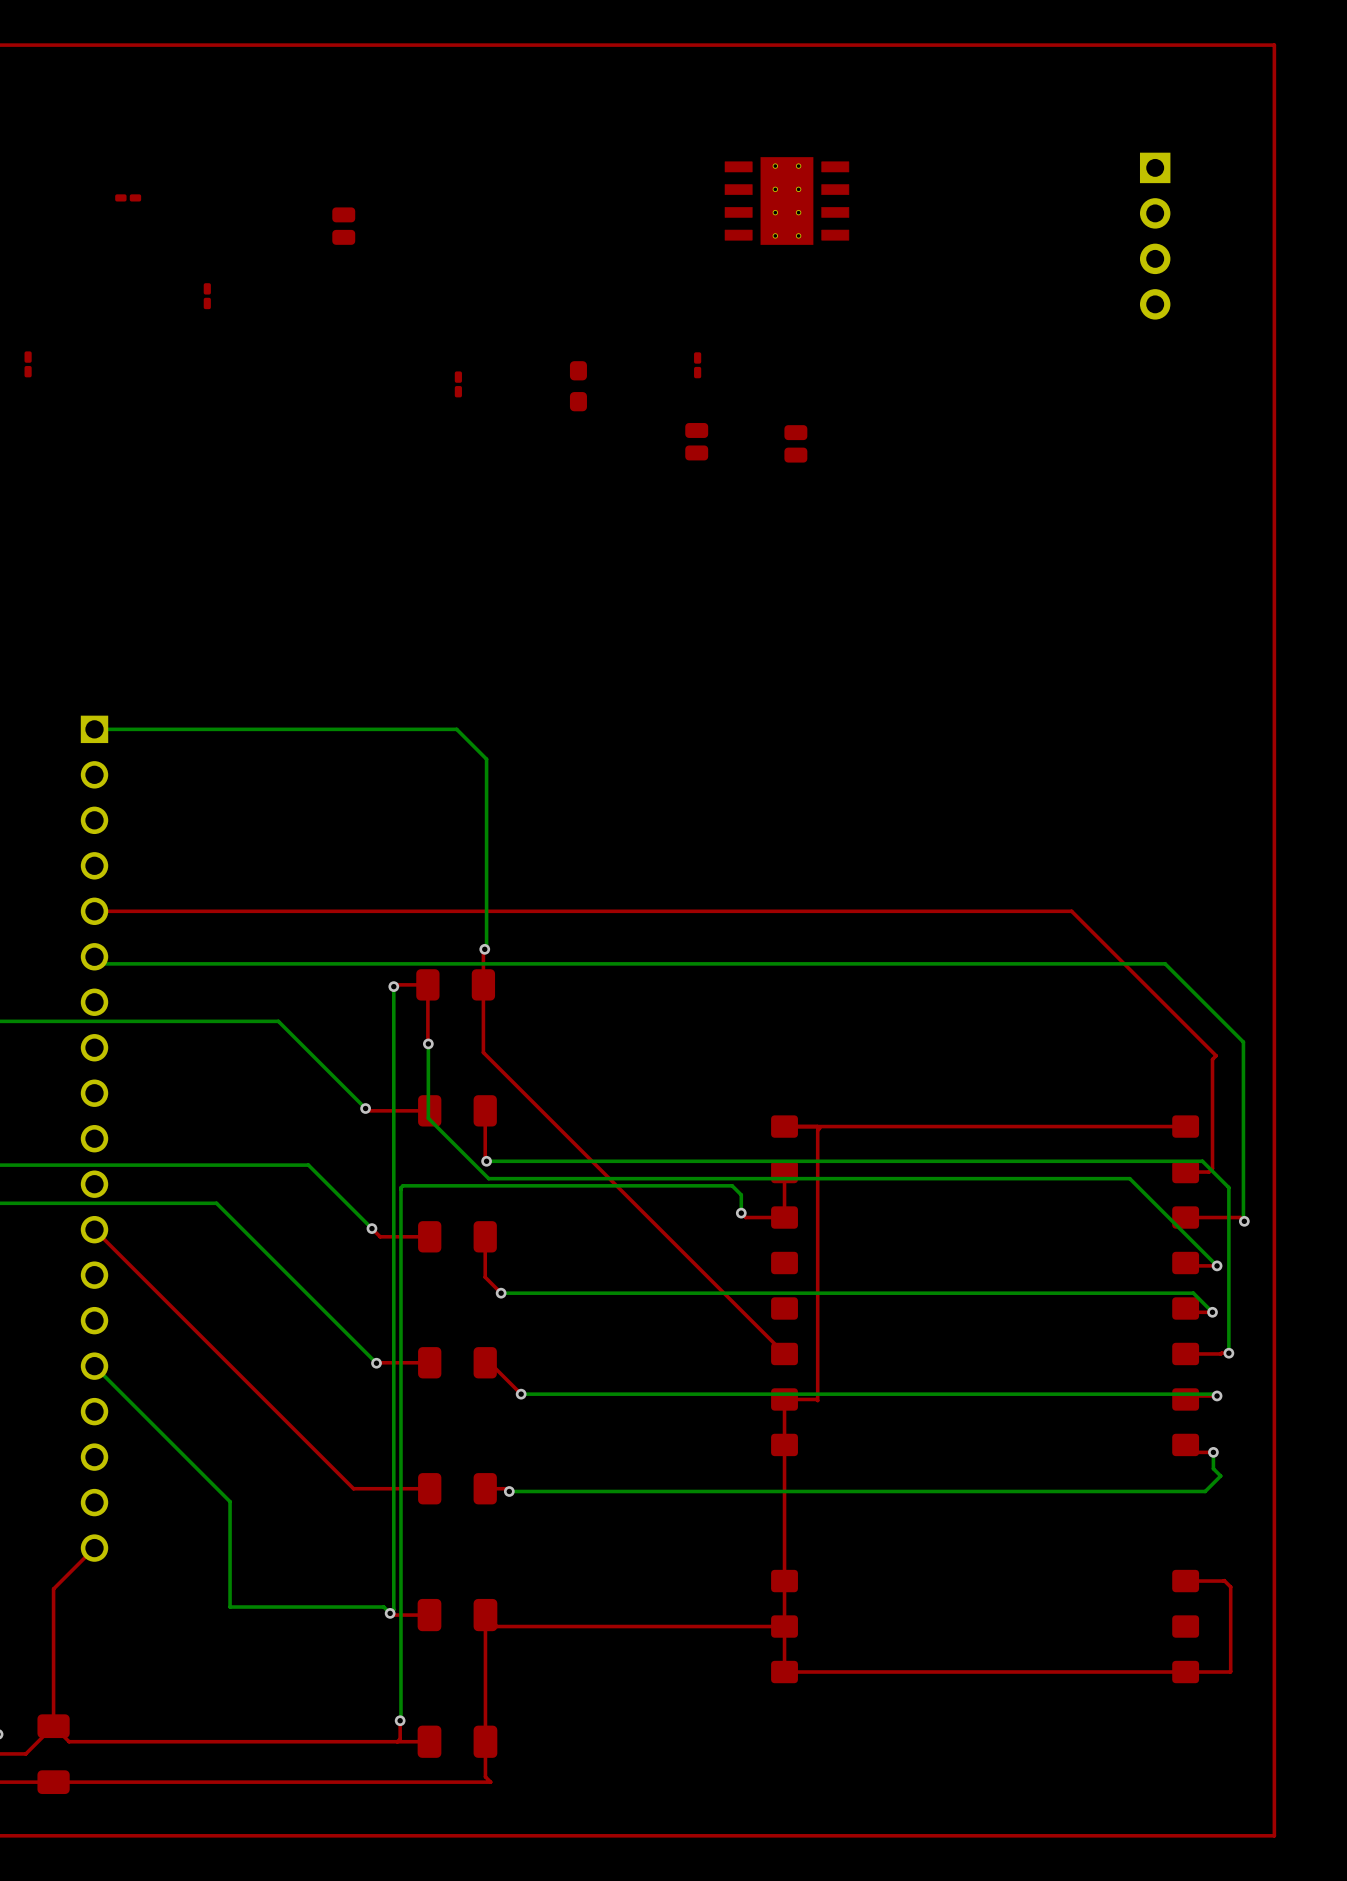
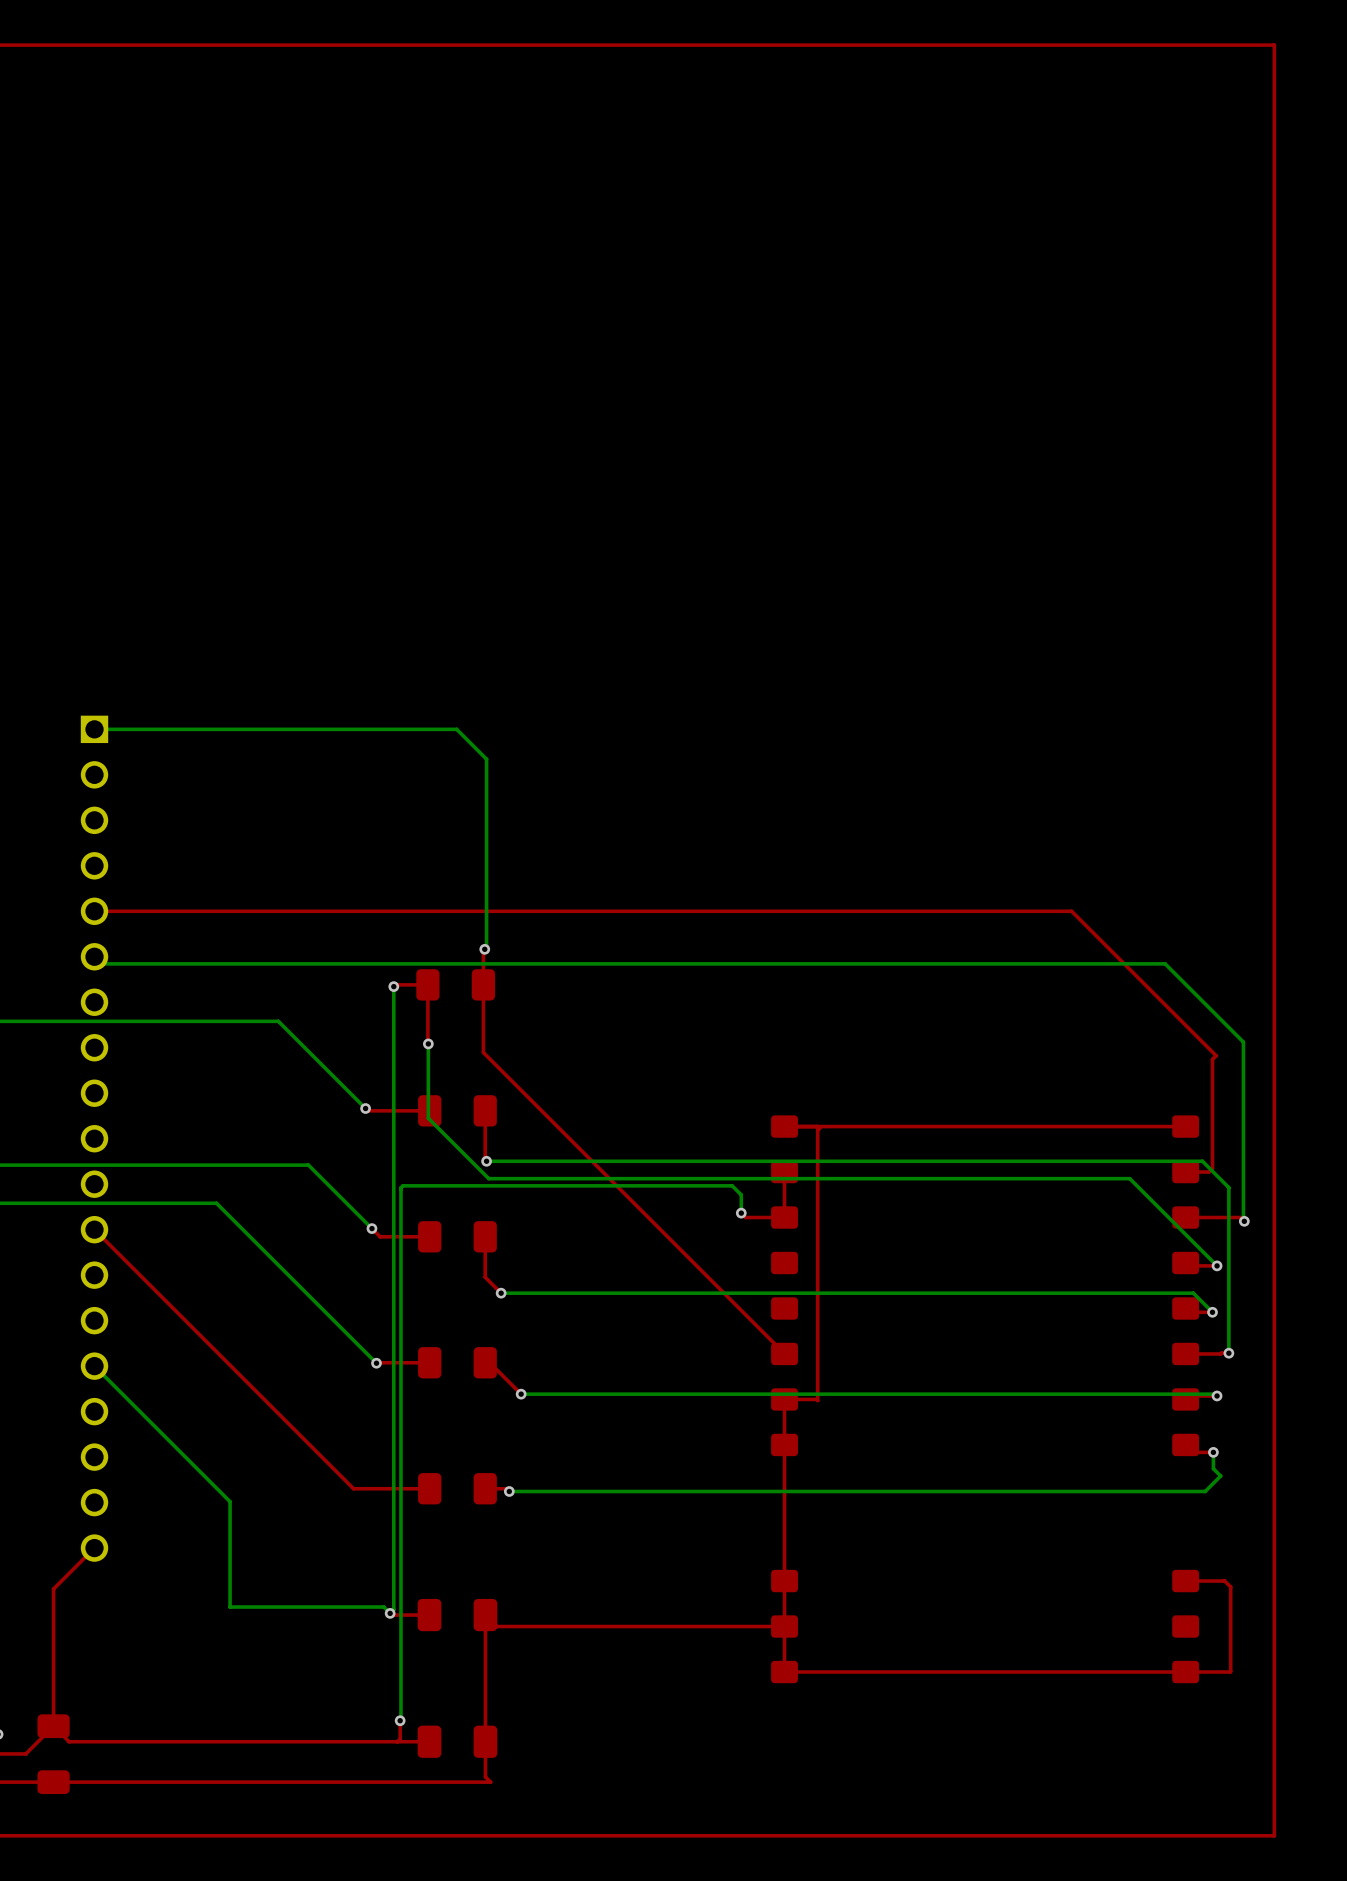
part: (128, 197) -> none
part: (786, 201) -> none
part: (343, 226) -> none
part: (1155, 236) -> none
part: (207, 296) -> none
part: (28, 364) -> none
part: (697, 365) -> none
part: (458, 384) -> none
part: (578, 386) -> none
part: (696, 441) -> none
part: (795, 443) -> none

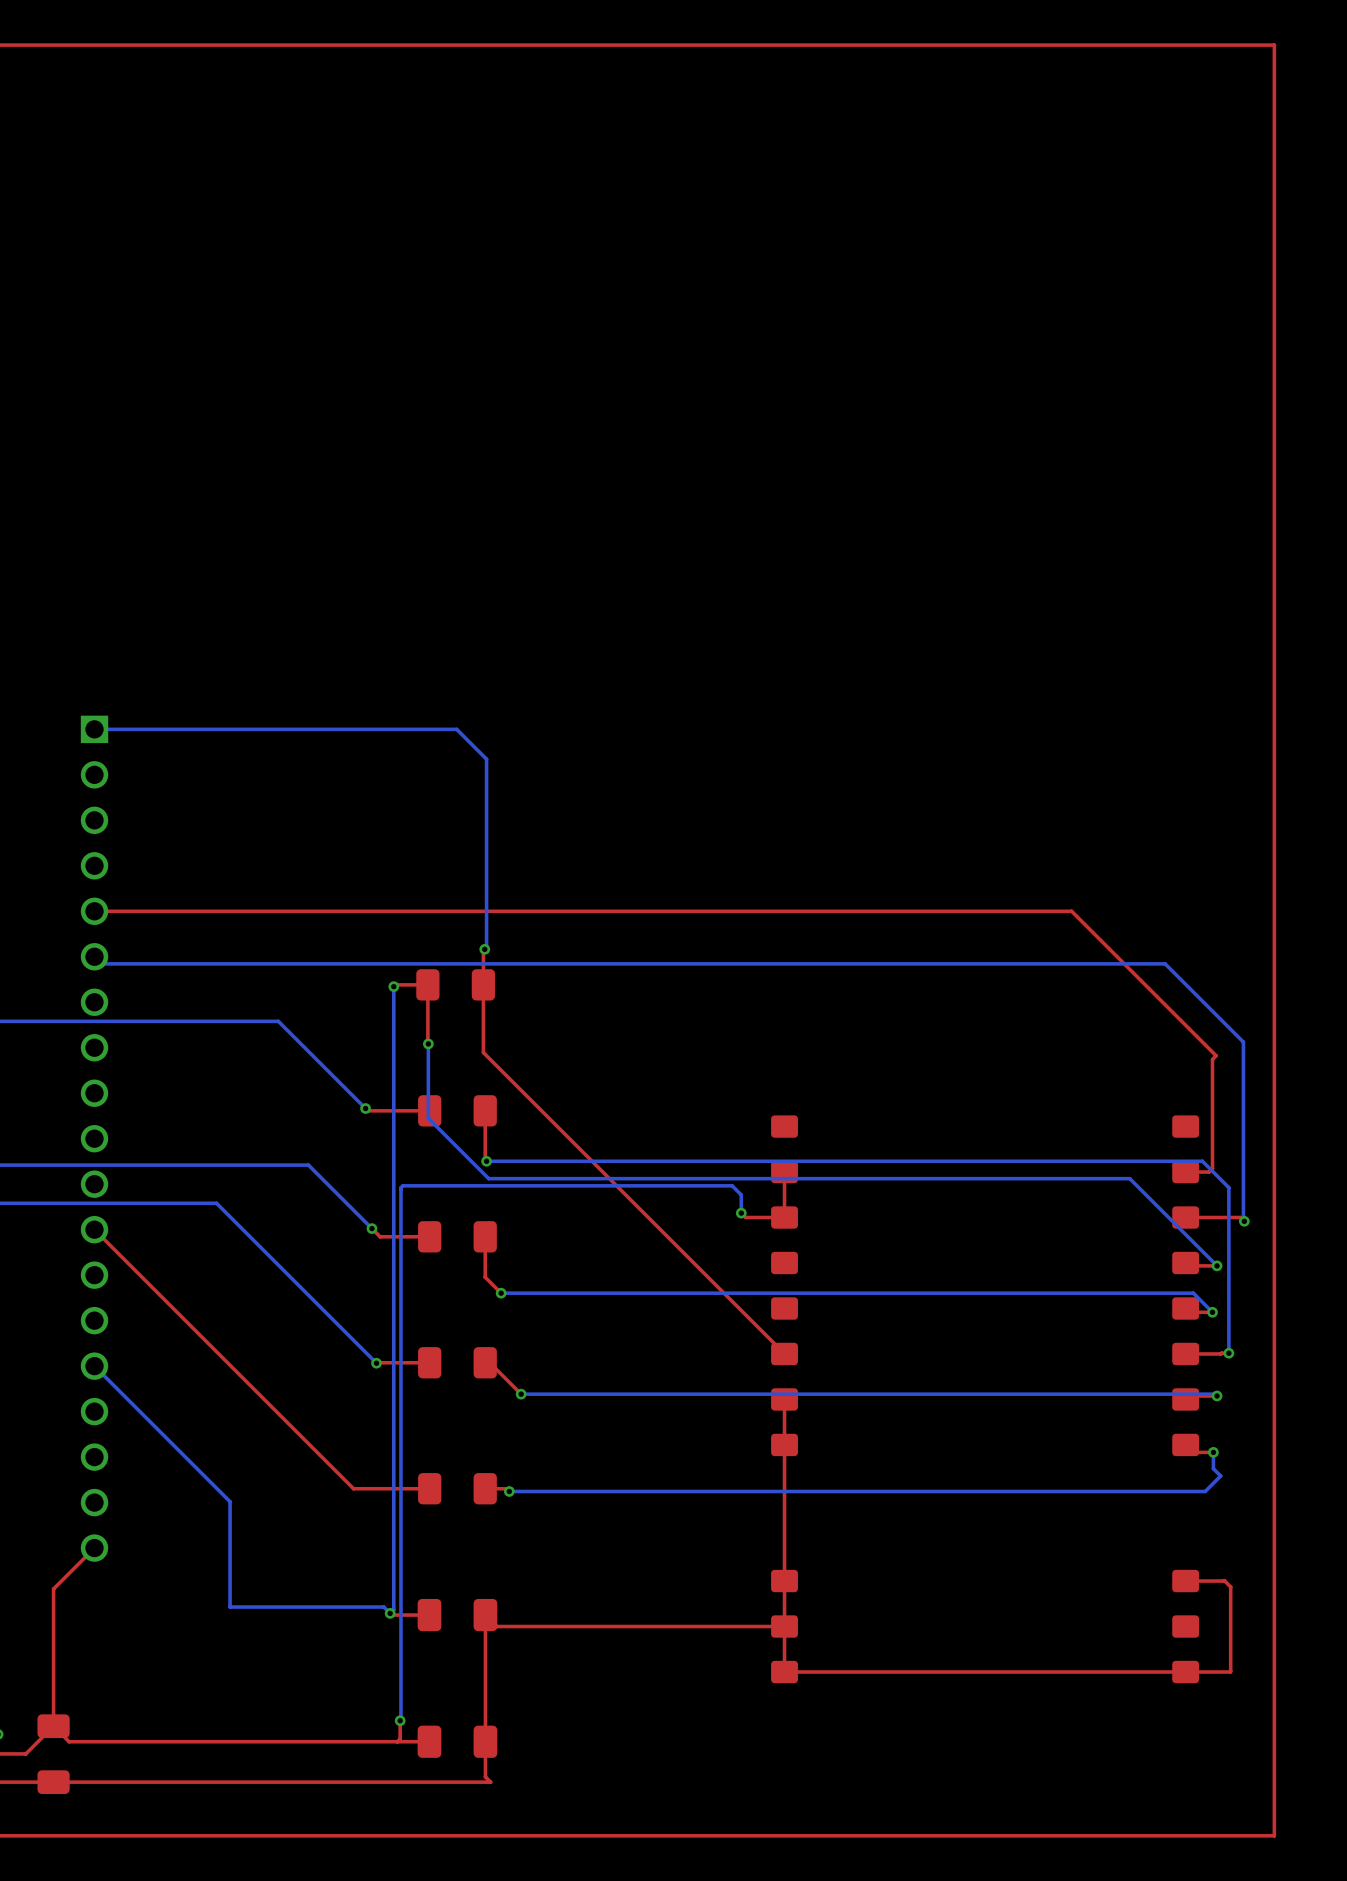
top track: (817, 1126) (819, 1128) (817, 1130) (817, 1400) (784, 1399) -> none
top track: (1185, 1126) (1181, 1123) (1178, 1126) (784, 1126) -> none

